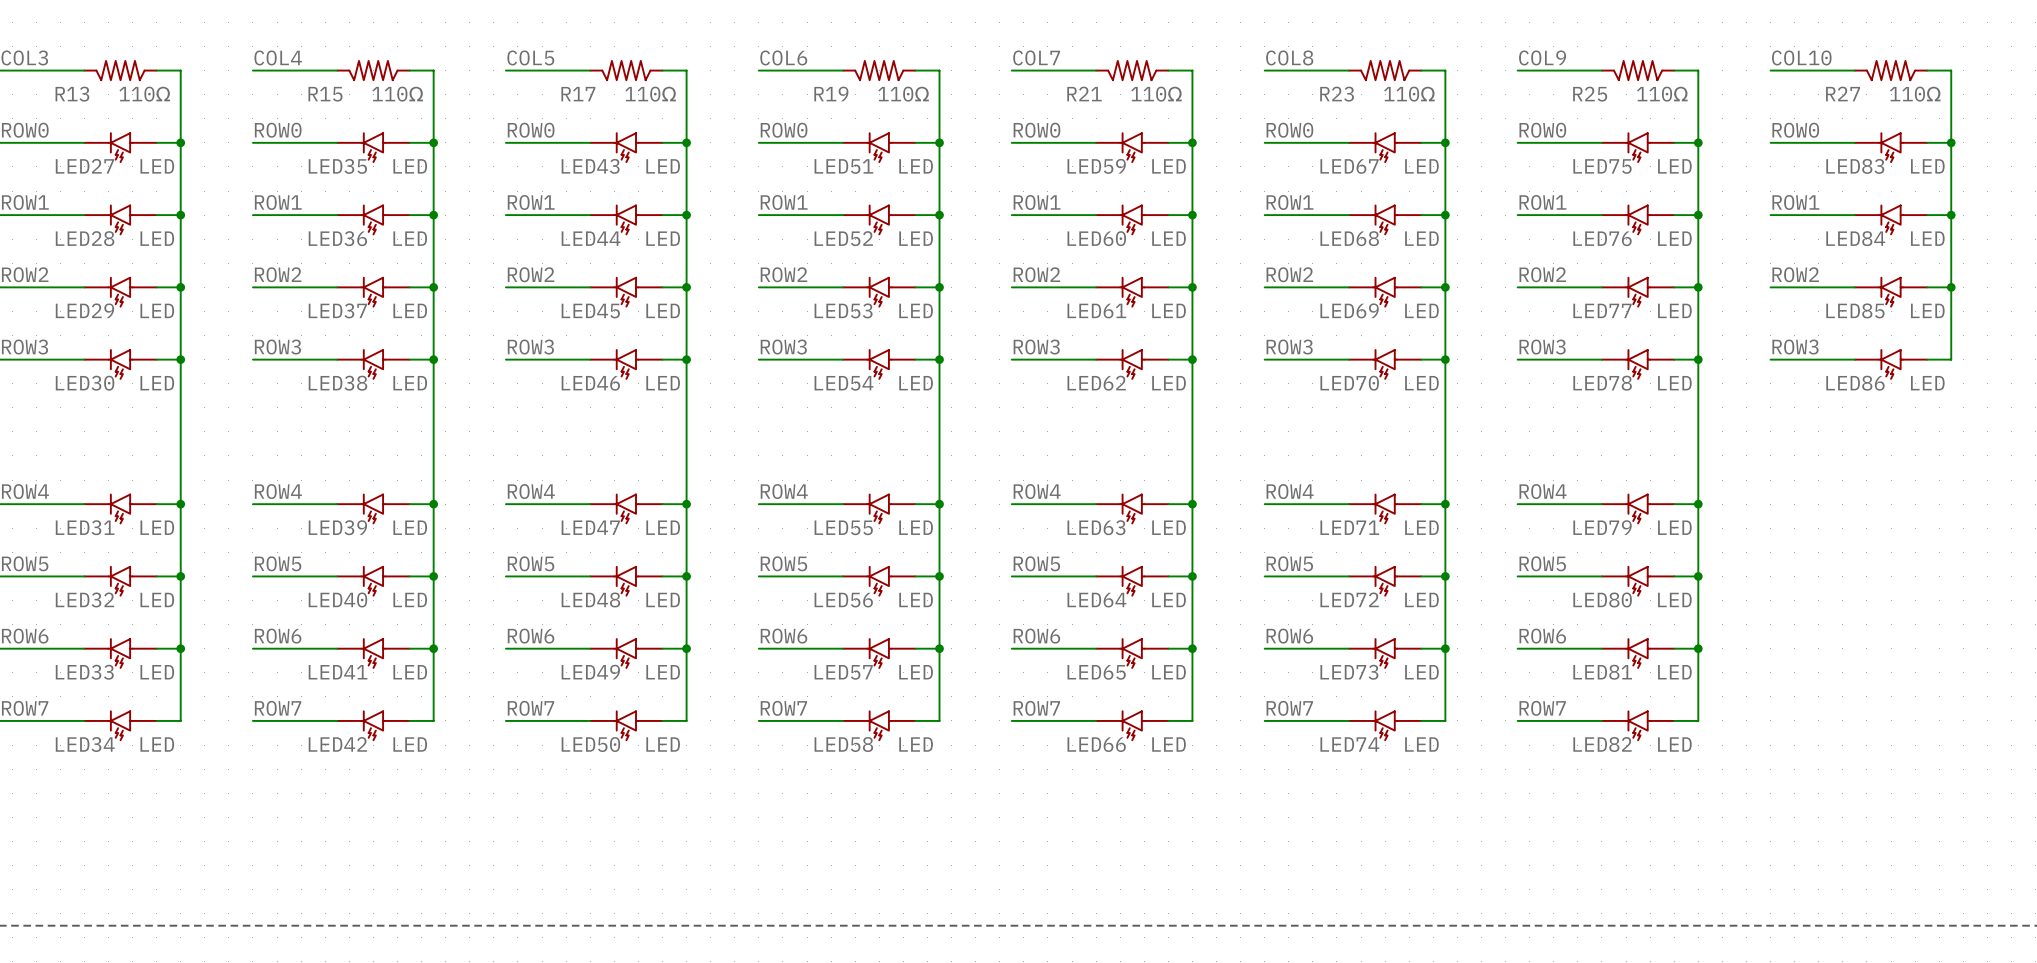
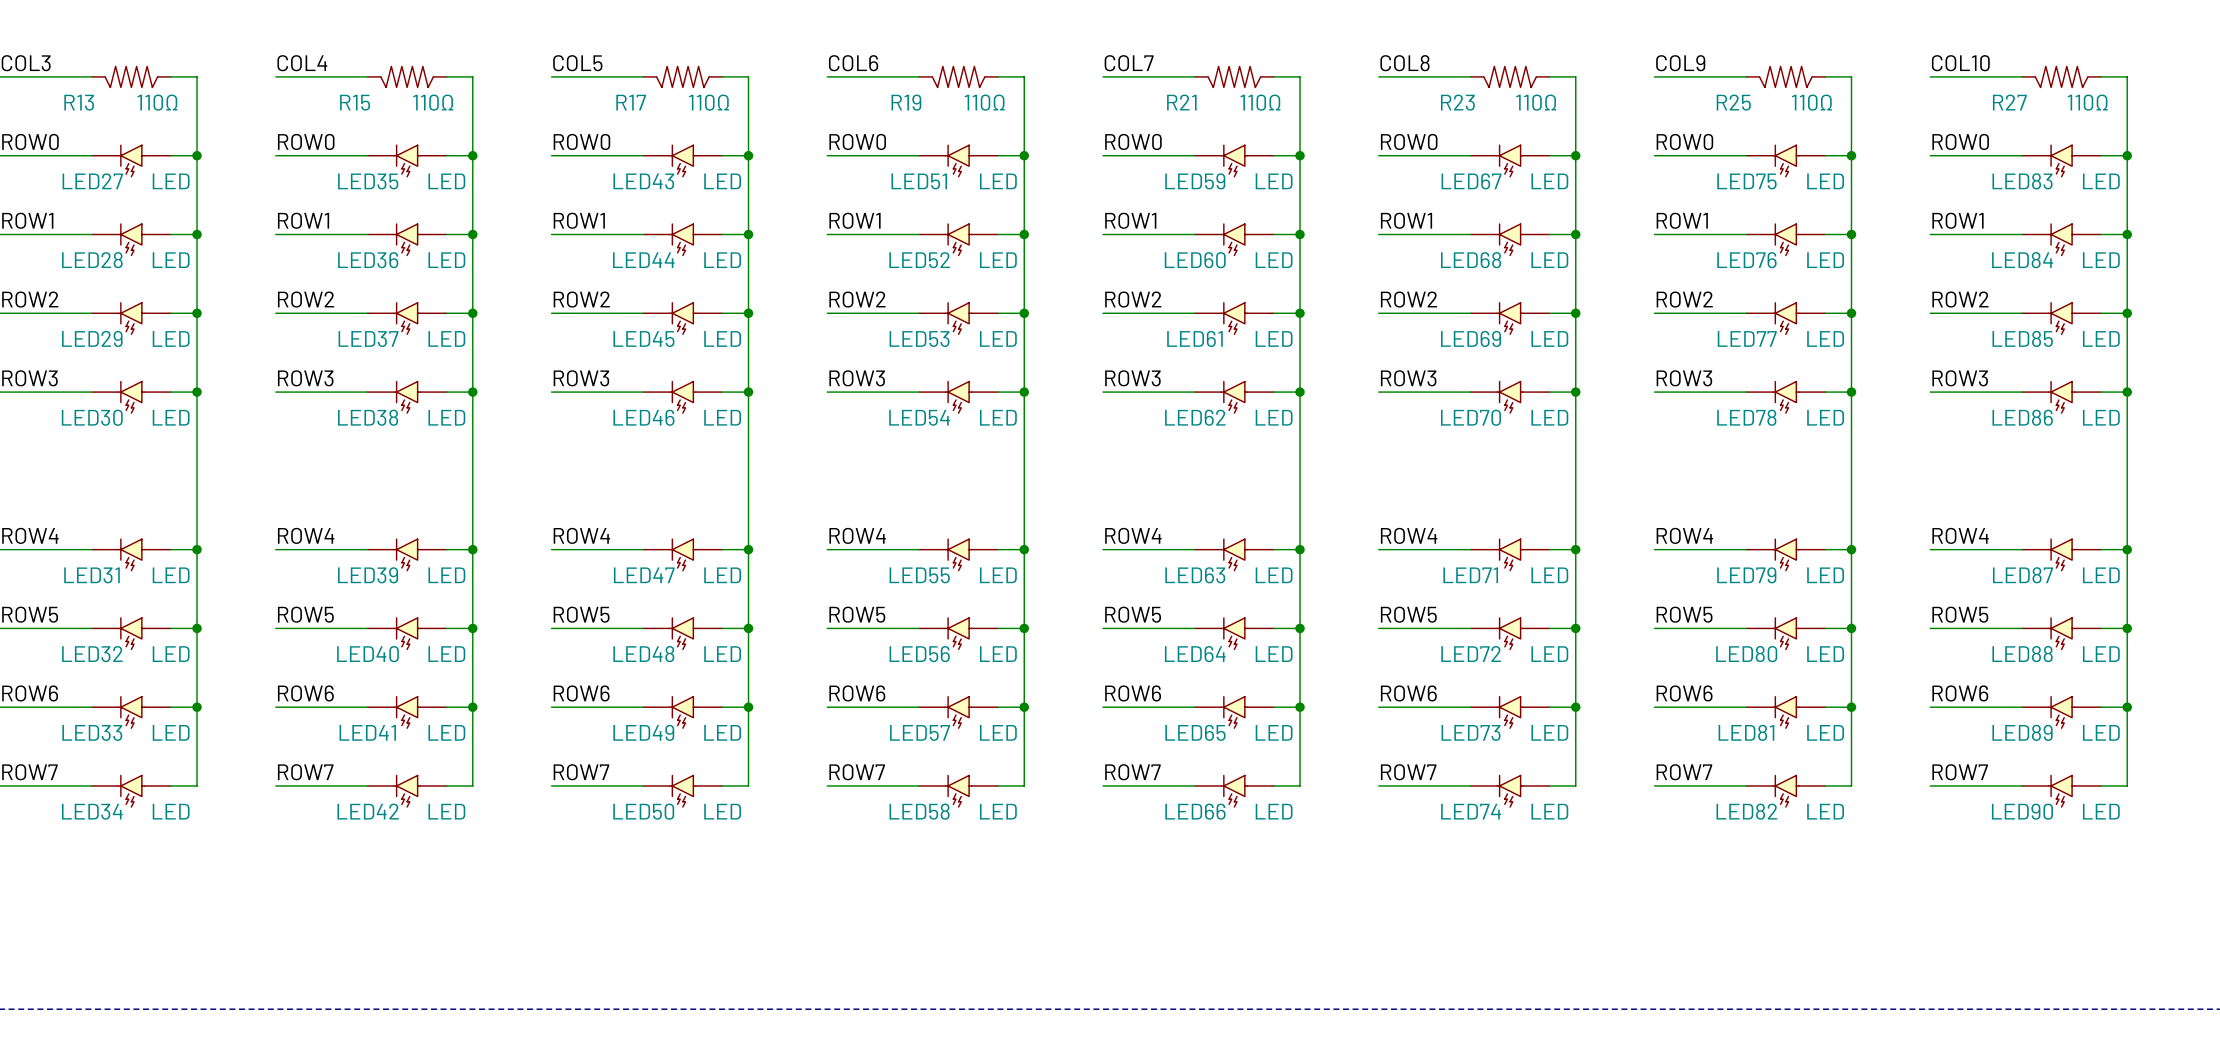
wire: none -> (2127, 392) (2127, 785) (2100, 785)
junction: none -> (2127, 392)
label: none -> ROW4 (1960, 535)
wire: none -> (1930, 549) (2022, 549)
wire: none -> (2100, 549) (2127, 549)
junction: none -> (2127, 549)
LED87: none -> LED (2061, 554)
label: none -> ROW5 (1960, 614)
wire: none -> (1930, 628) (2022, 628)
wire: none -> (2100, 628) (2127, 628)
junction: none -> (2127, 628)
LED88: none -> LED (2061, 633)
label: none -> ROW6 (1960, 693)
wire: none -> (1930, 707) (2022, 707)
wire: none -> (2100, 707) (2127, 707)
junction: none -> (2127, 707)
LED89: none -> LED (2061, 712)
label: none -> ROW7 (1960, 772)
wire: none -> (1930, 785) (2022, 785)
LED90: none -> LED (2061, 791)

